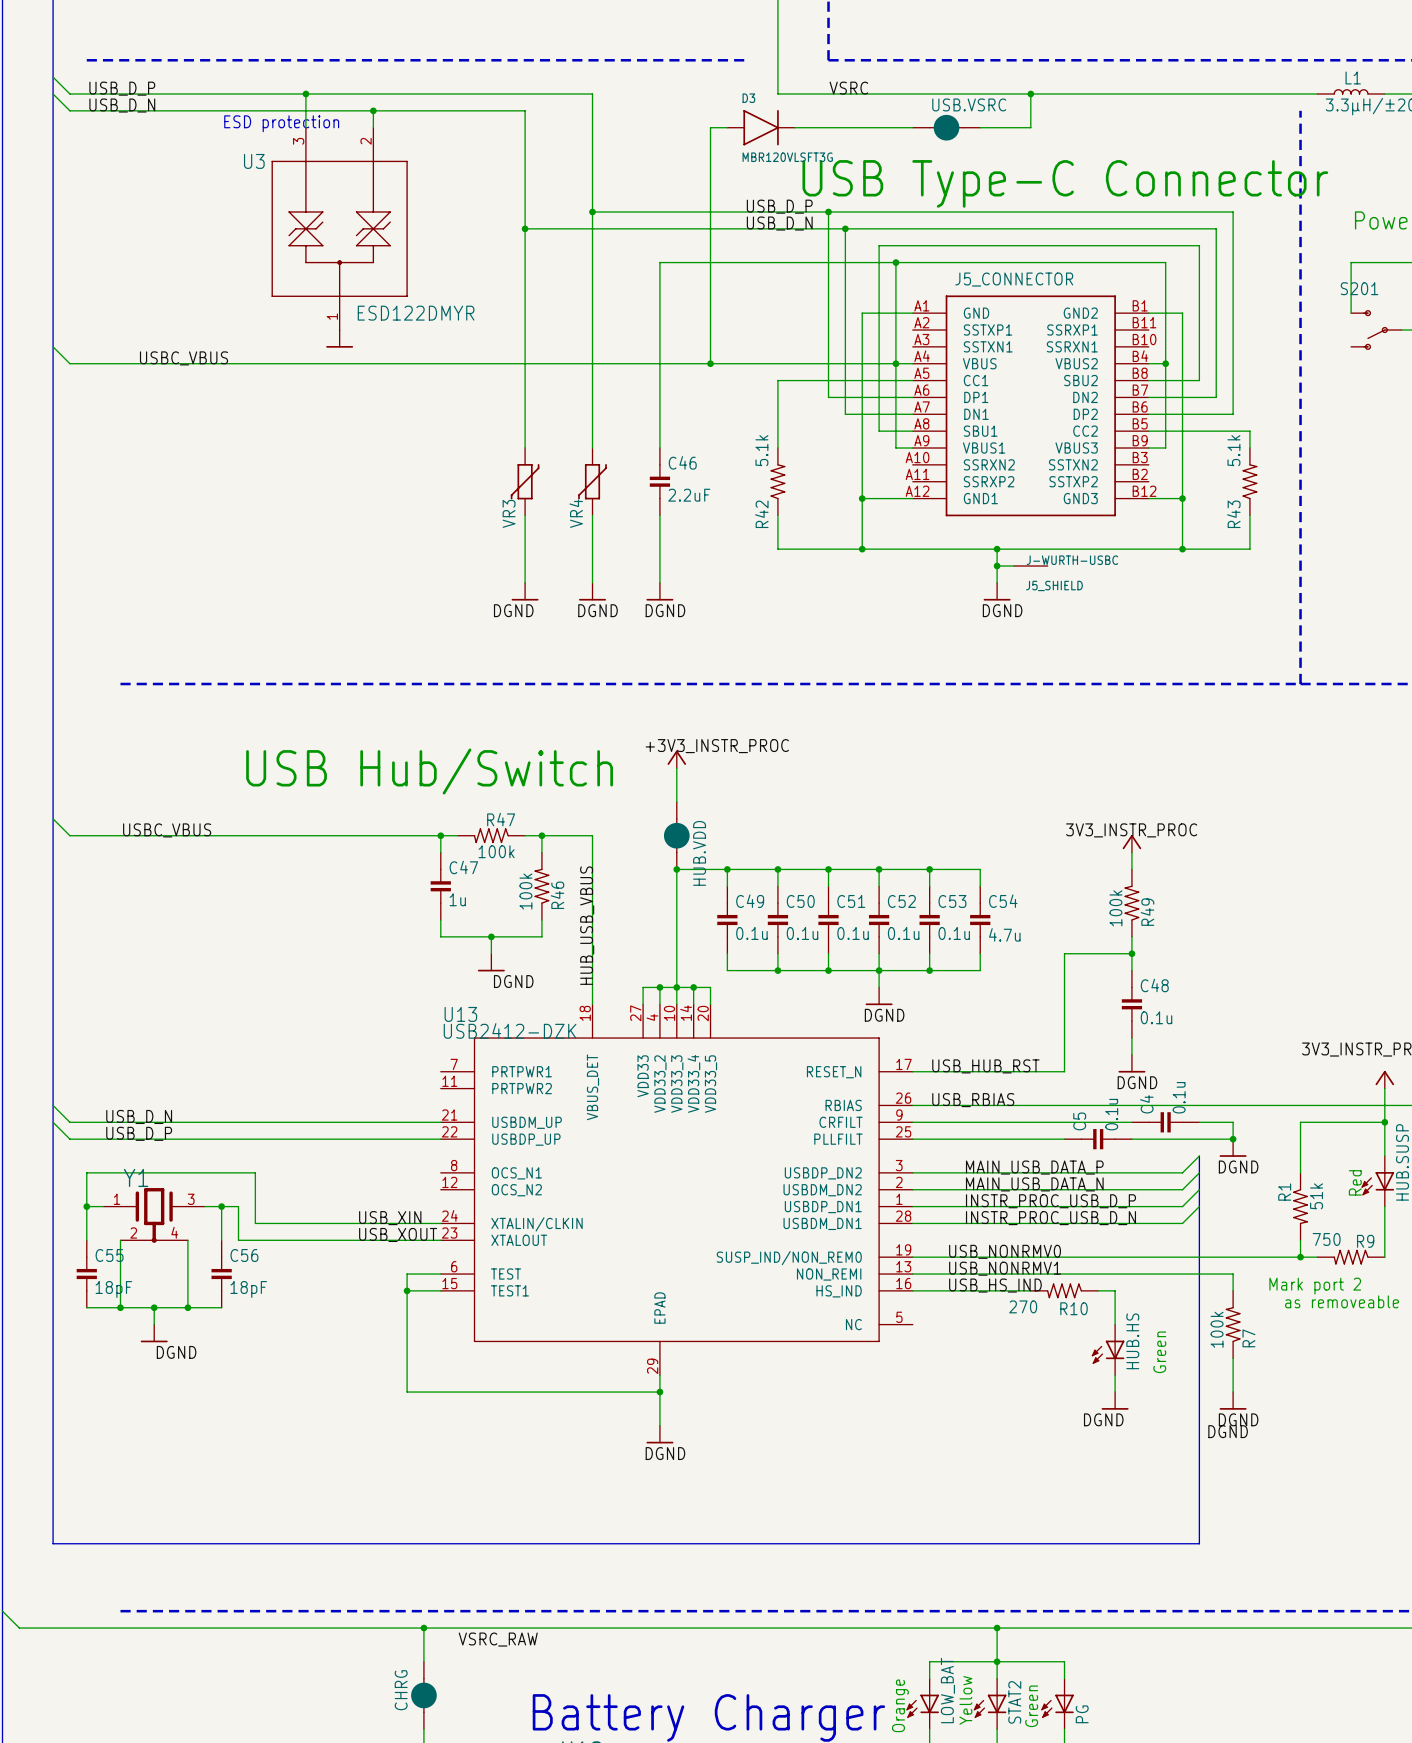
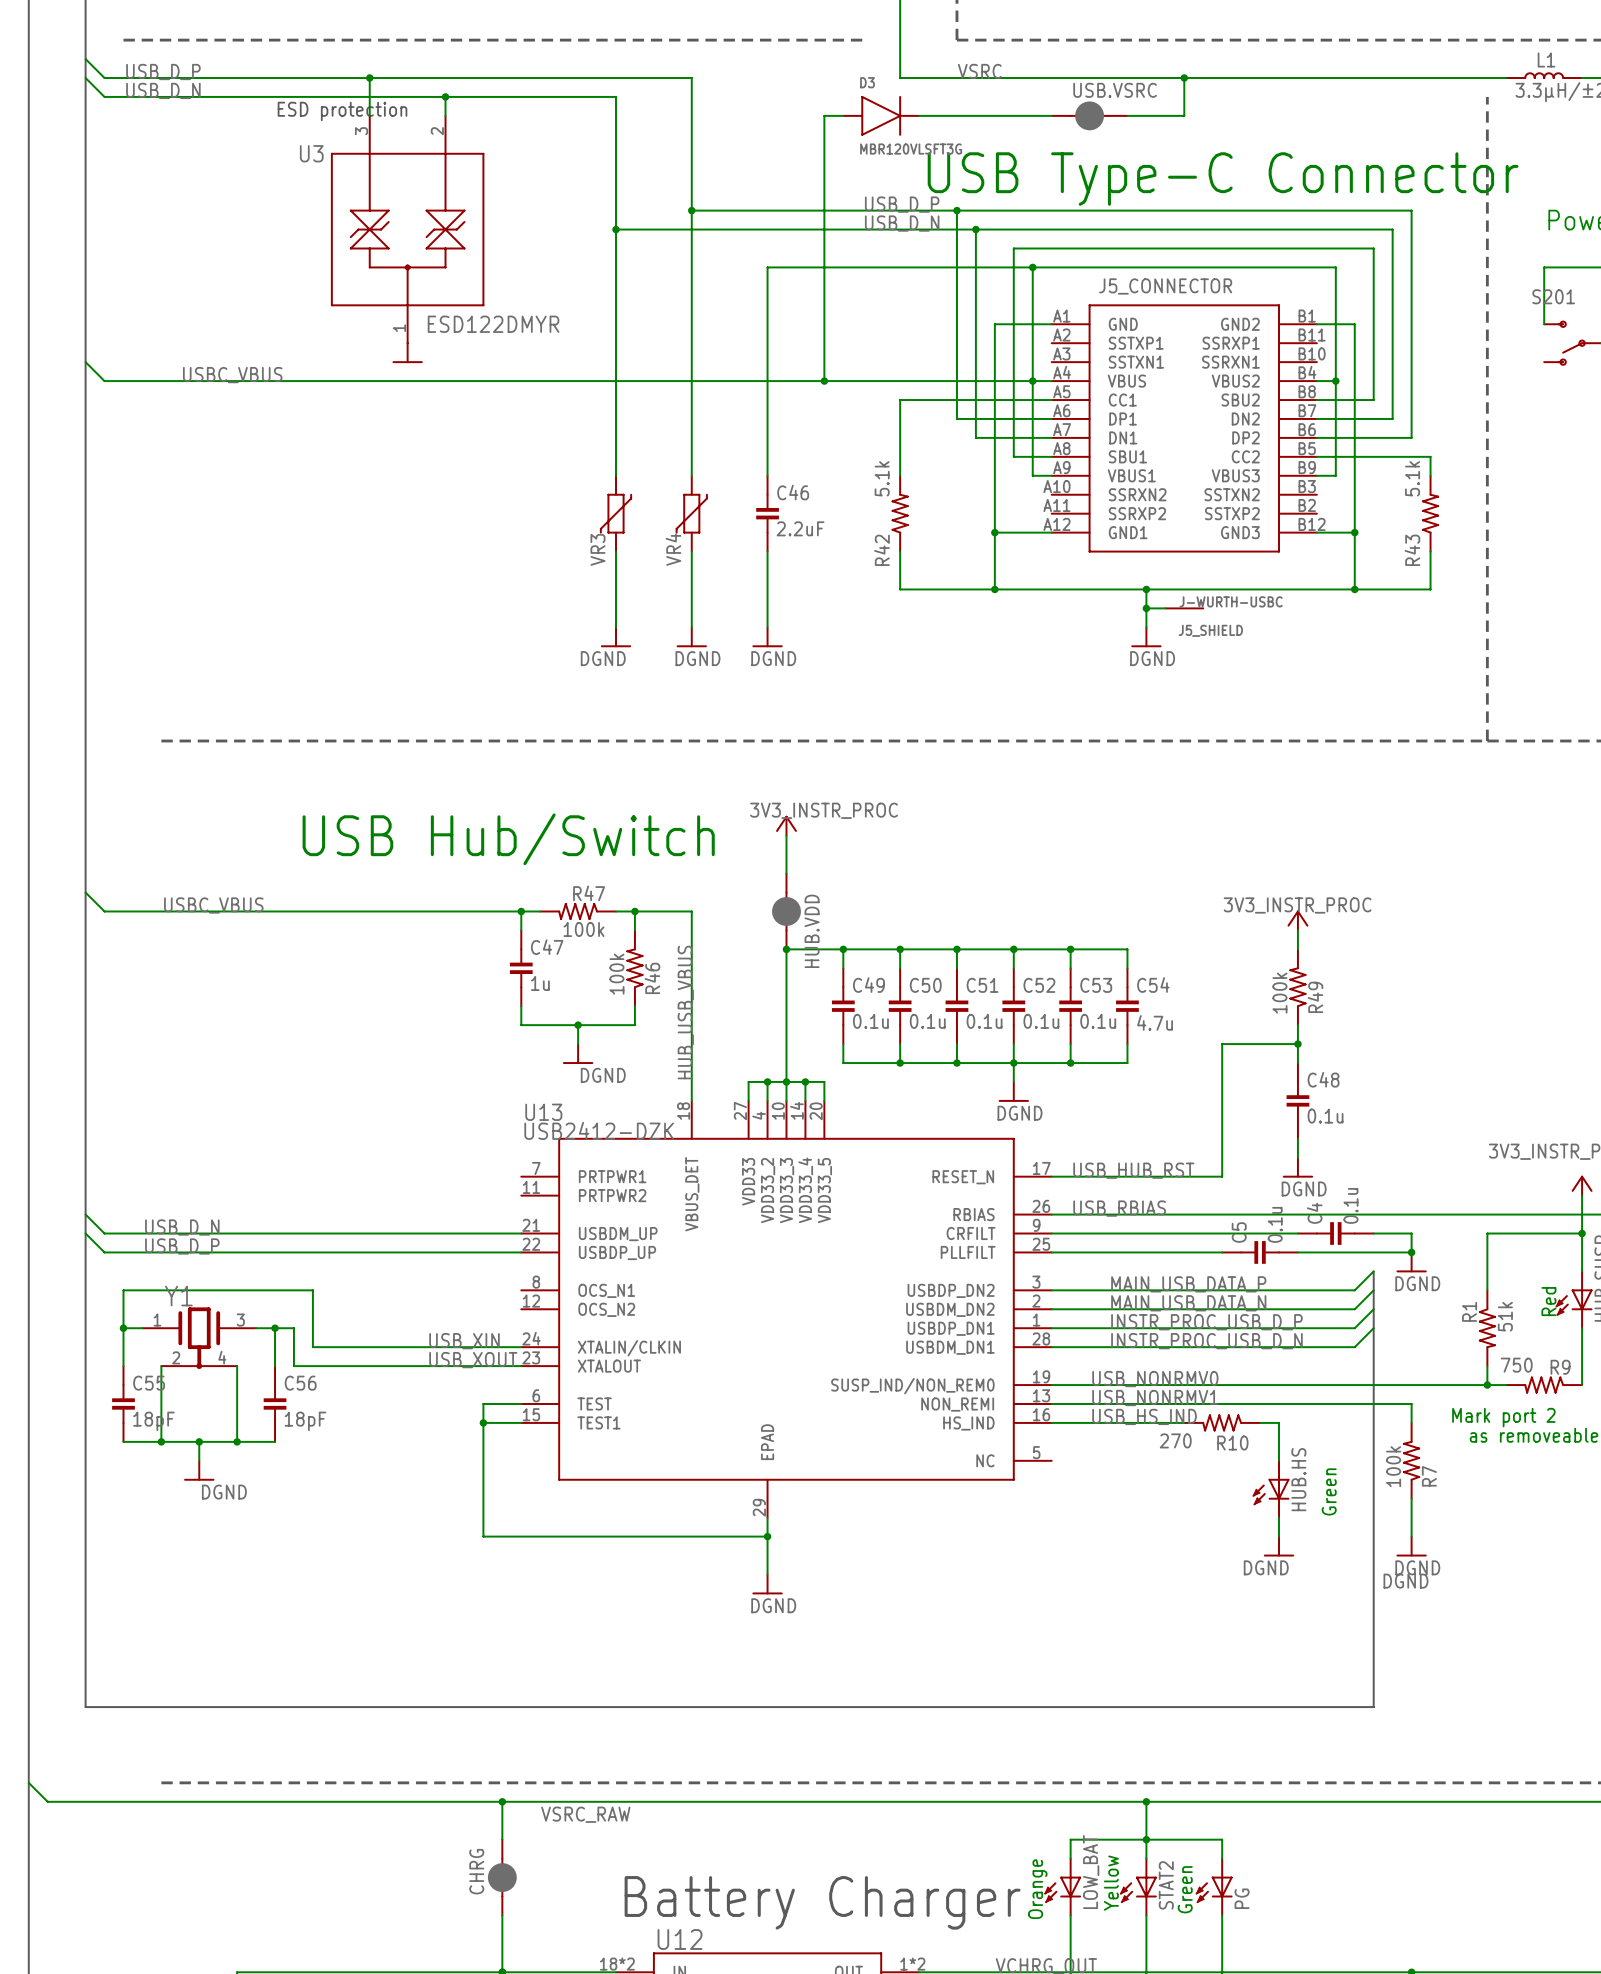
label: +3V3_INSTR_PROC (717, 746) -> 3V3_INSTR_PROC (824, 810)

